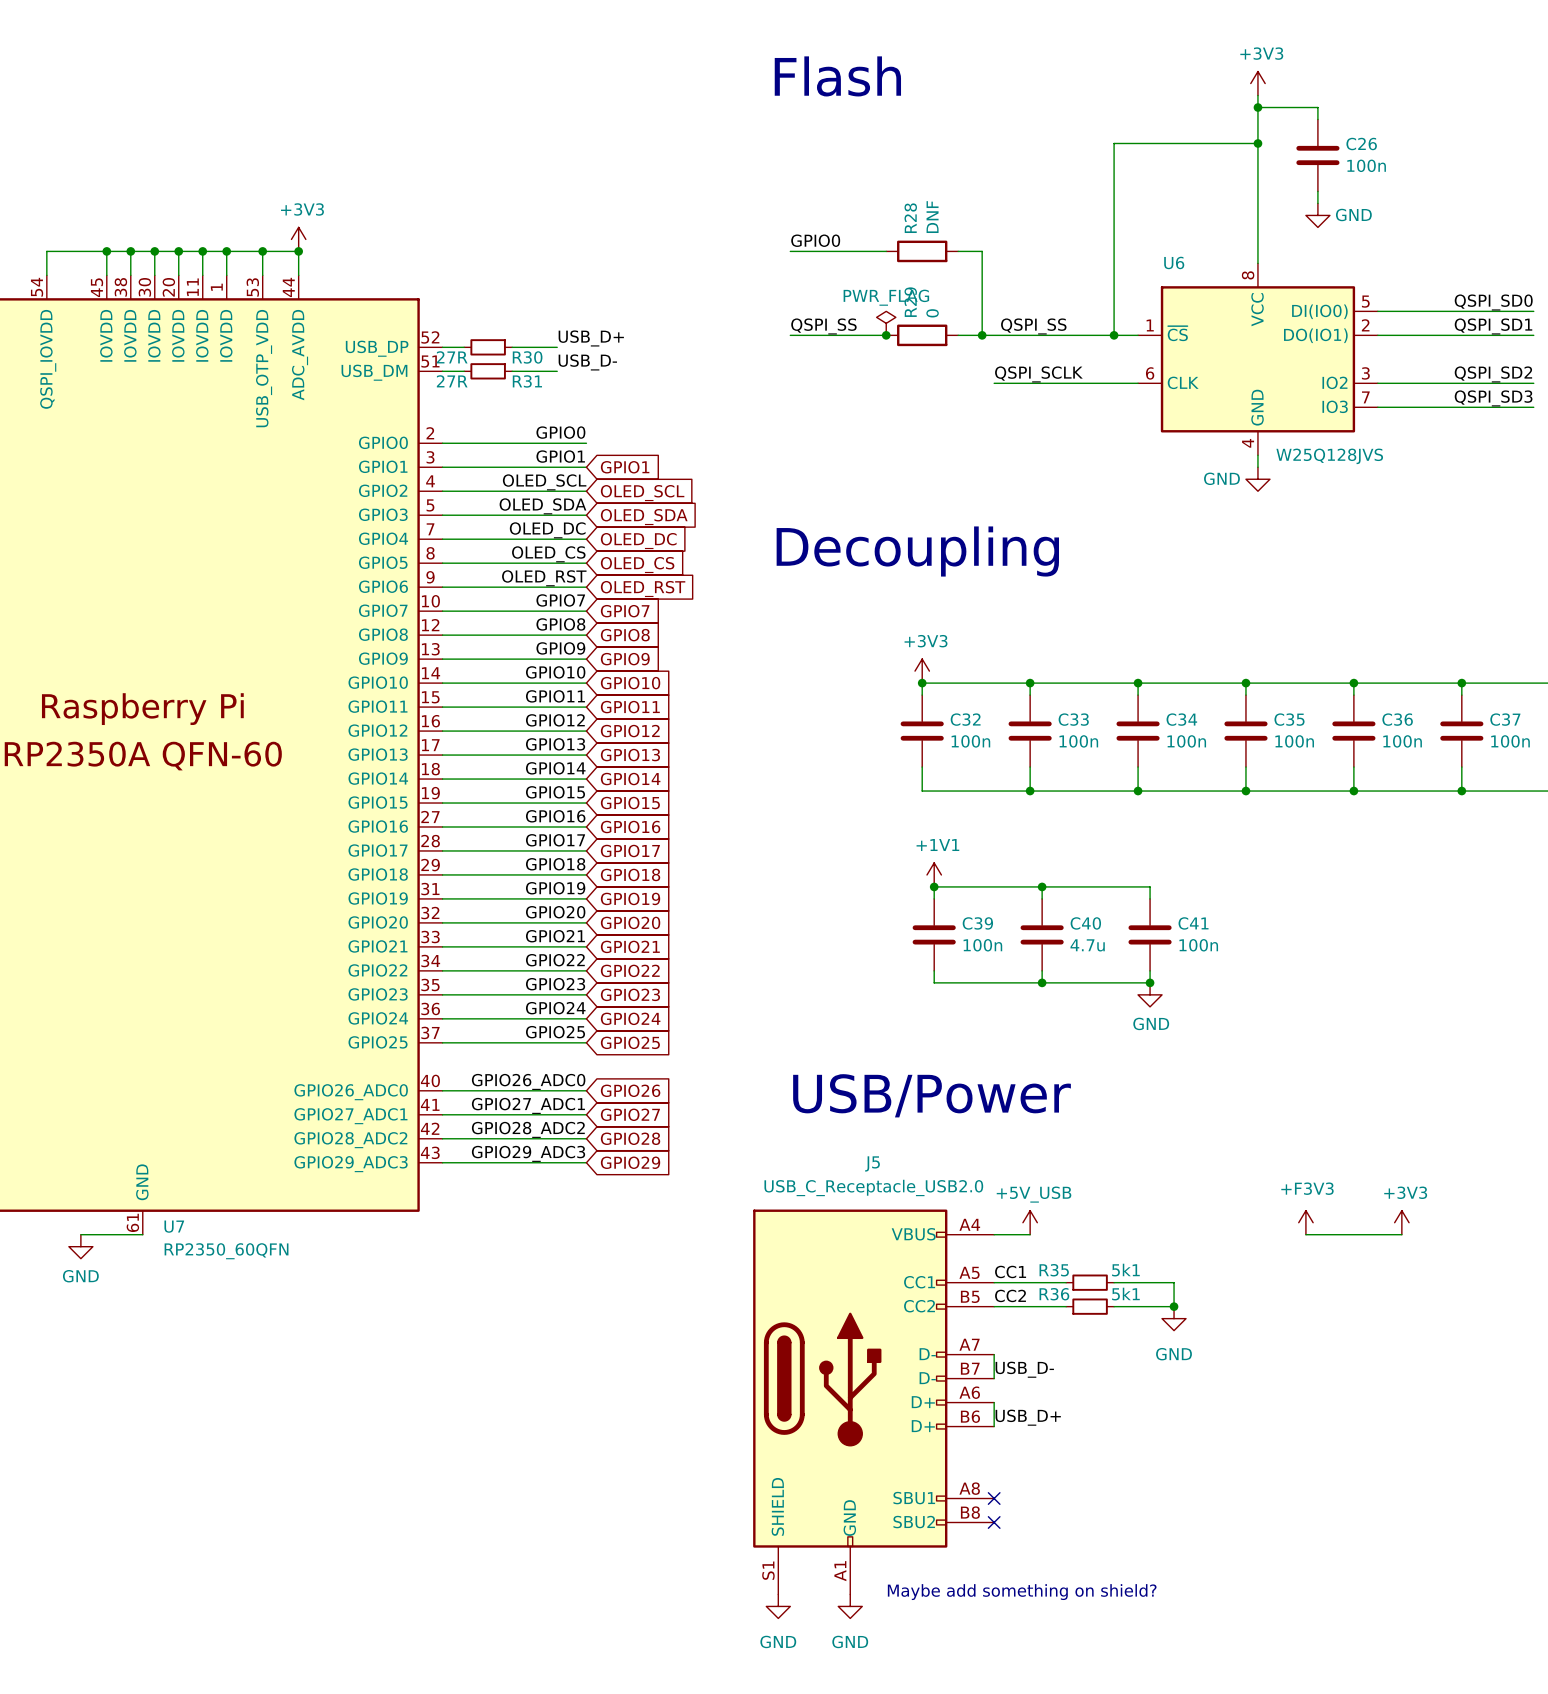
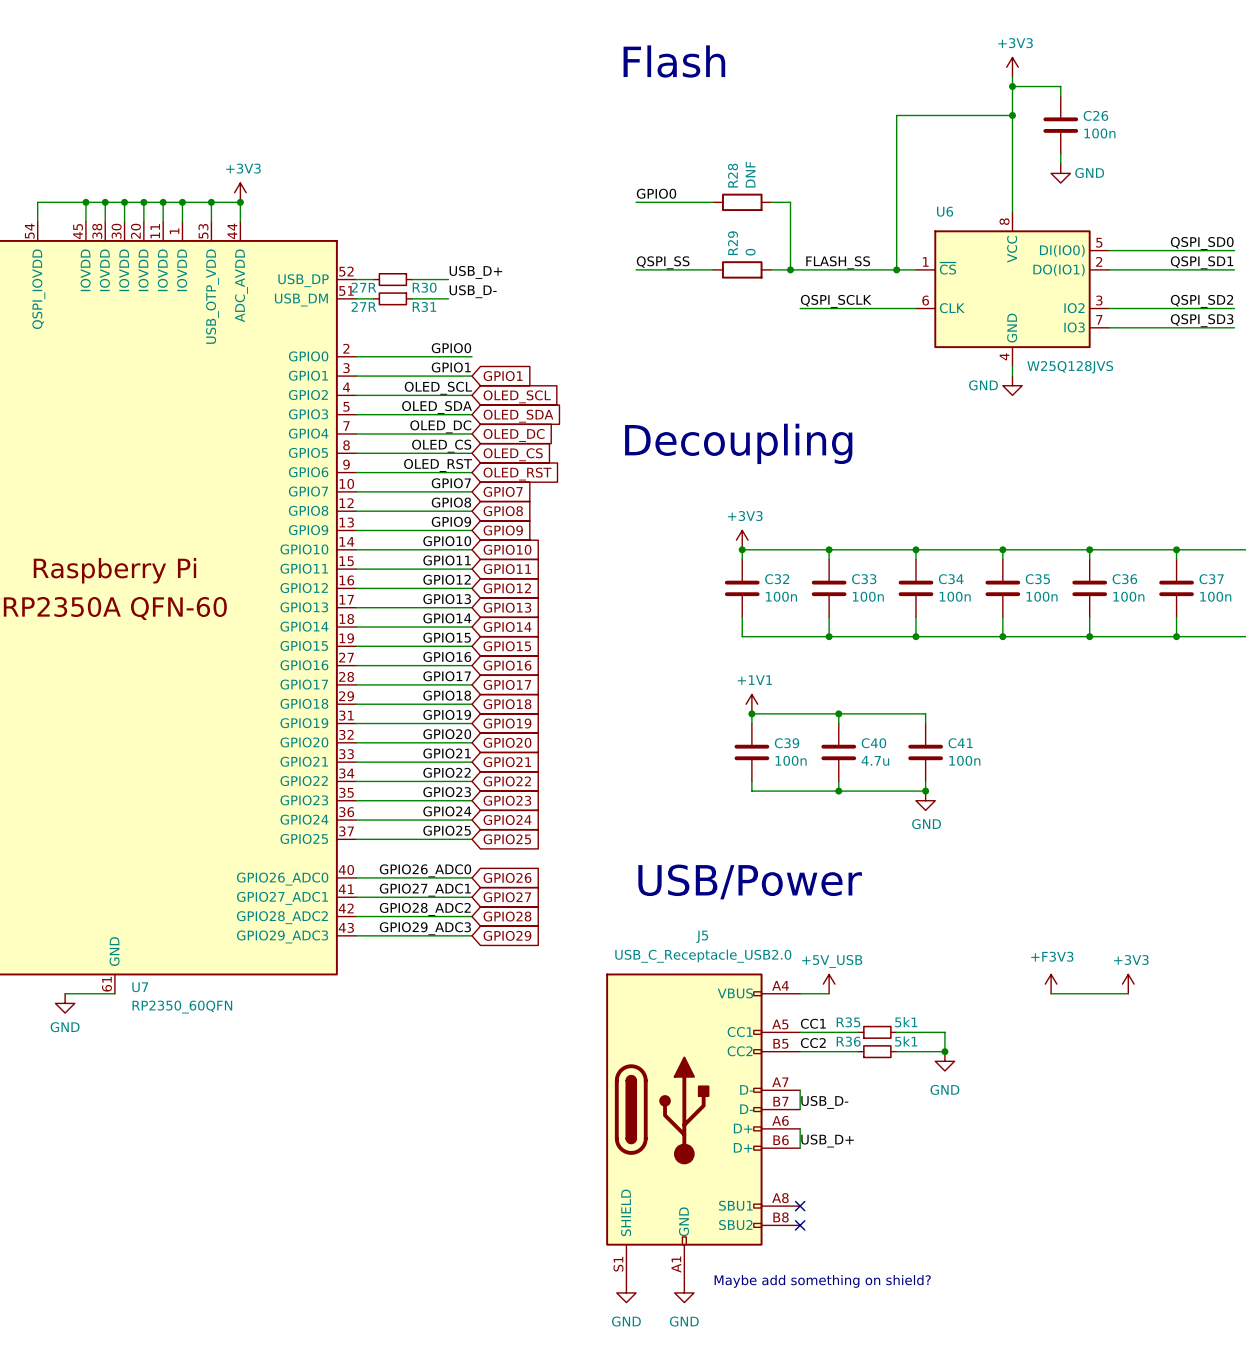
power symbol: PWR_FLAG (886, 323) -> none
label: QSPI_SS (1033, 326) -> FLASH_SS (838, 262)
junction: (886, 335) -> none

